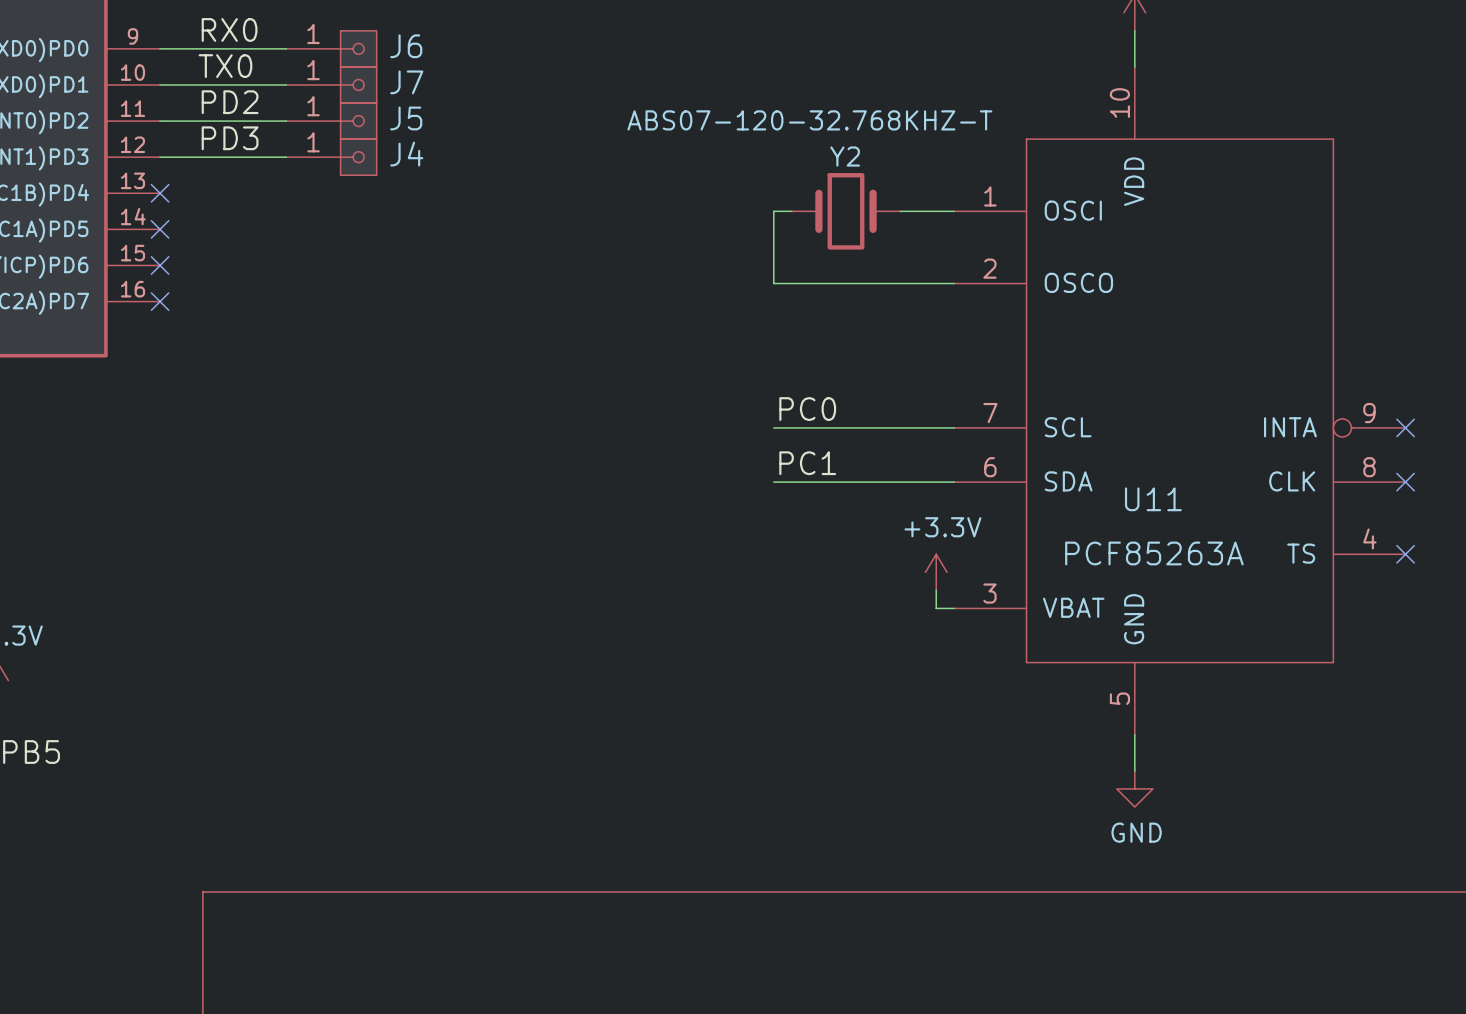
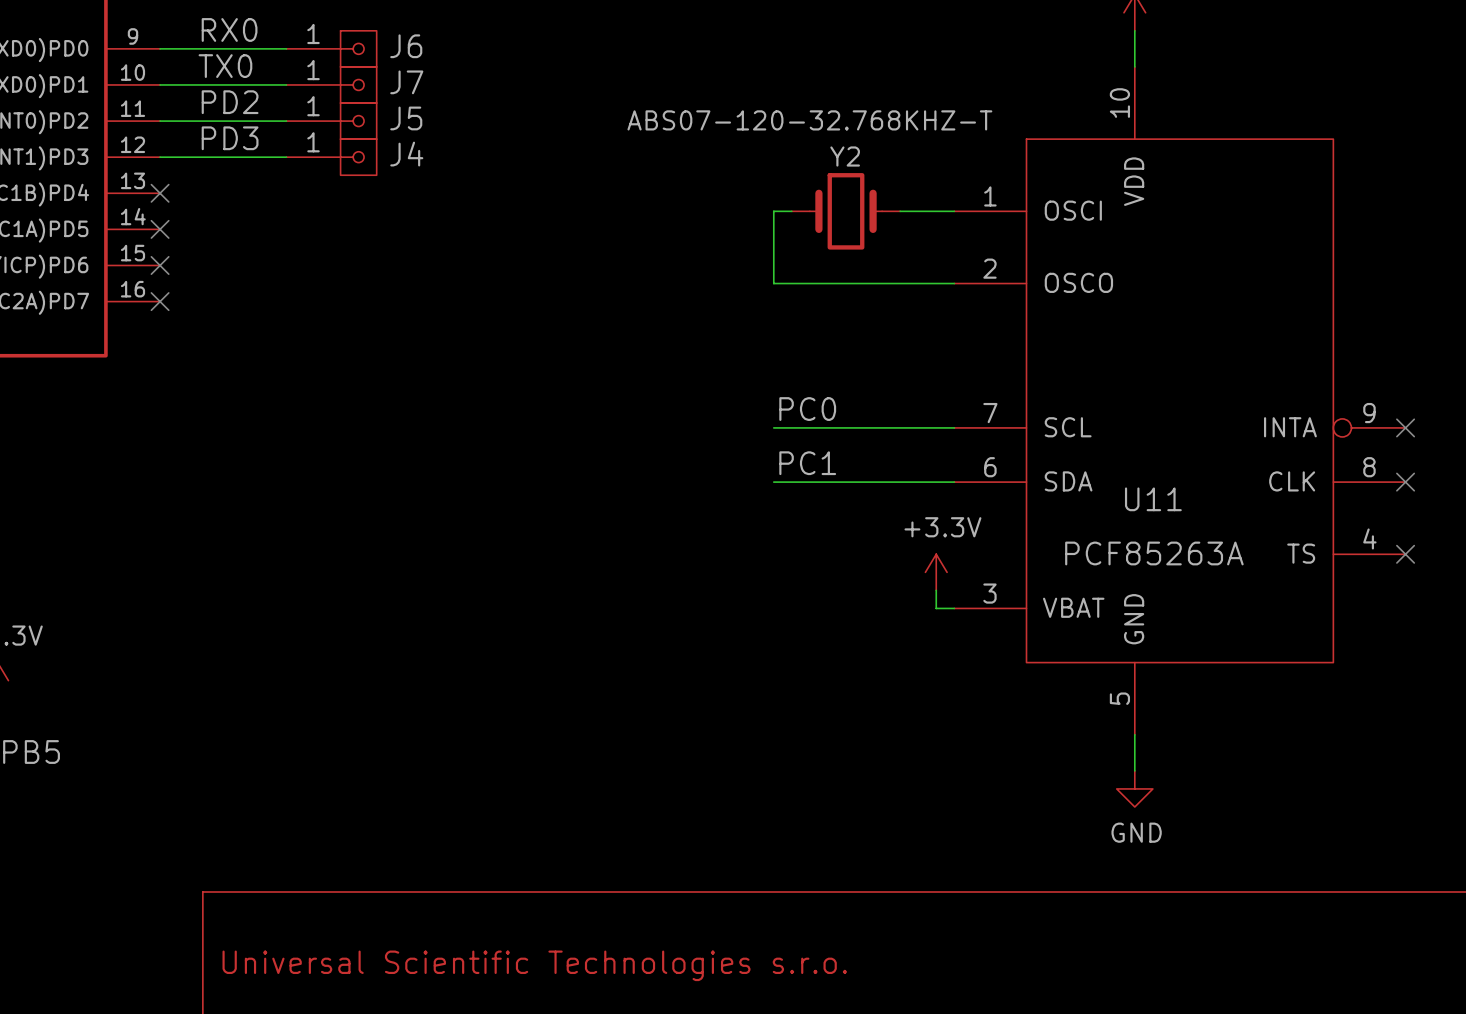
title block: none -> Universal Scientific Technologies s.r.o. (534, 965)

